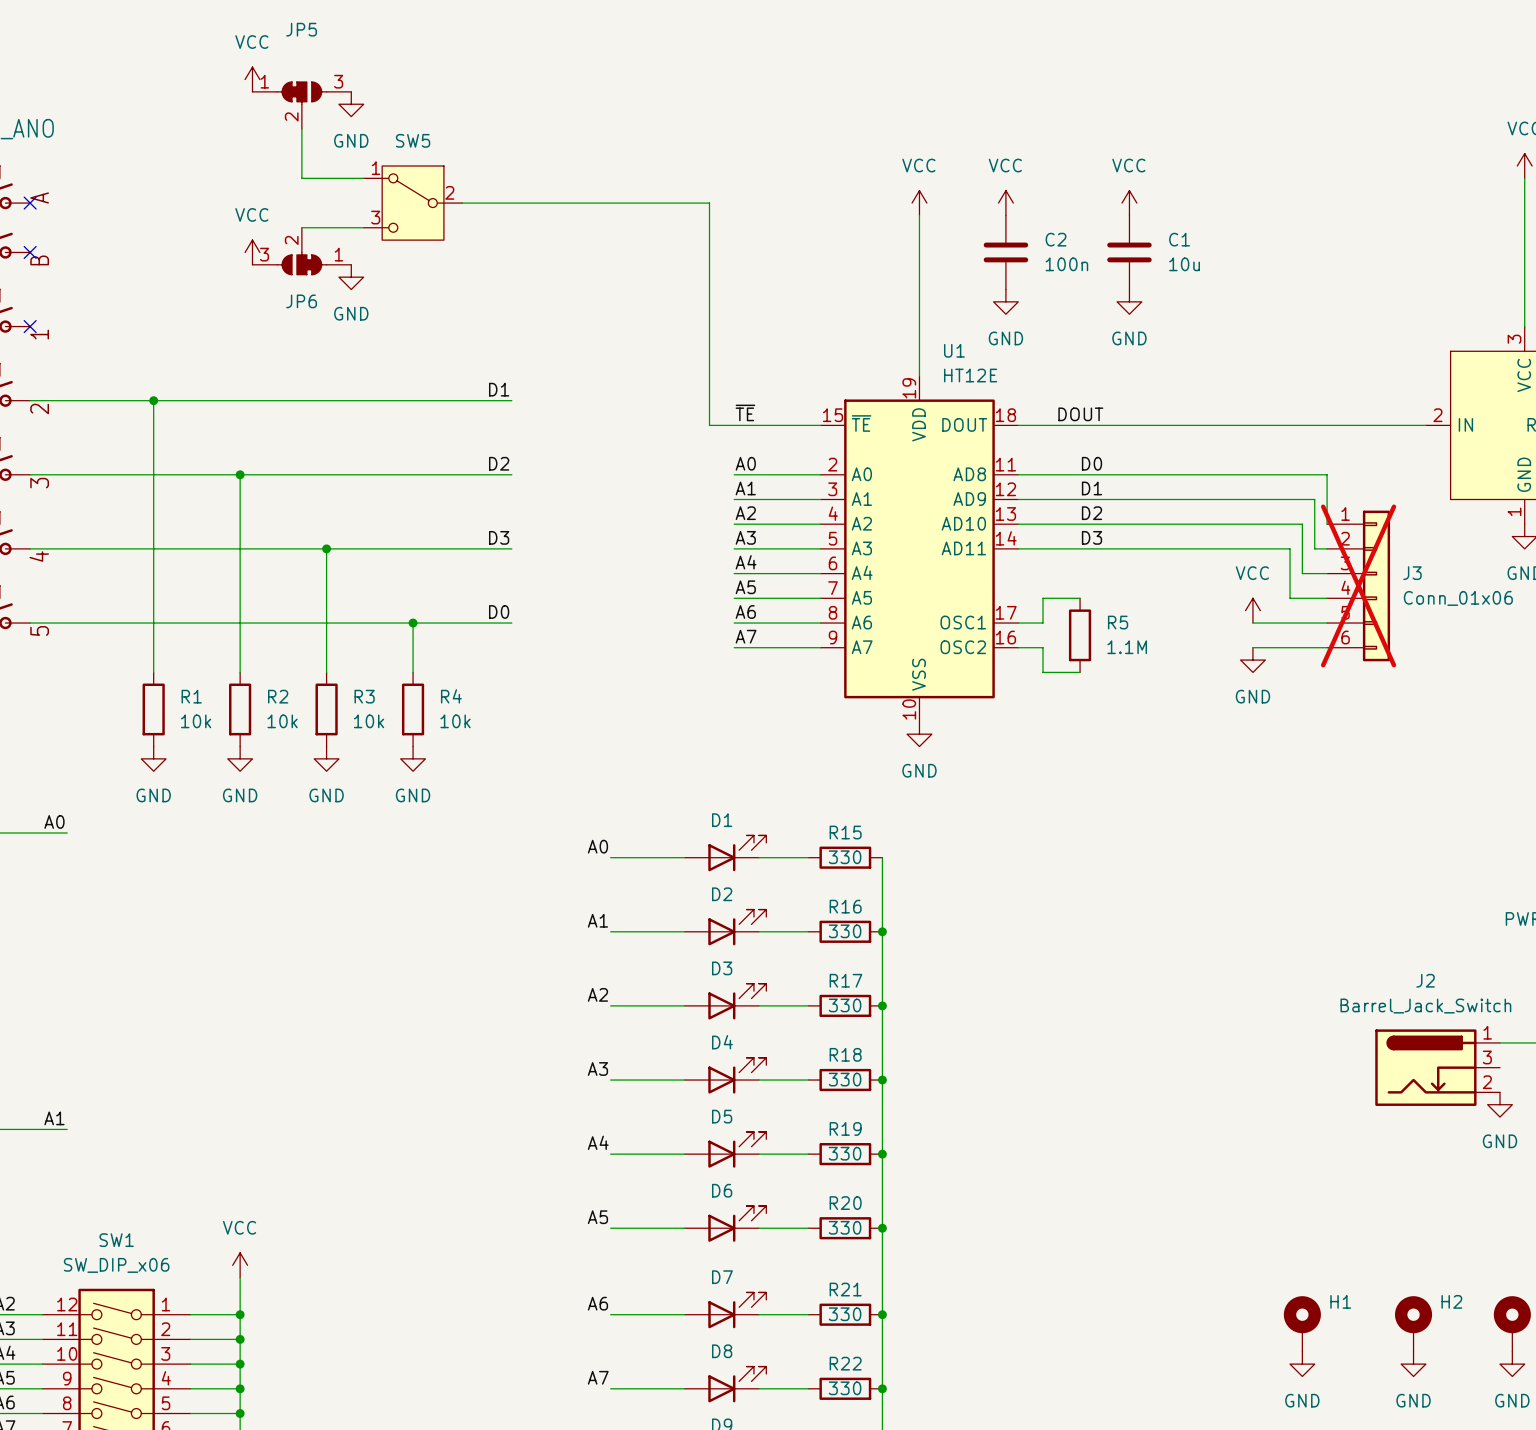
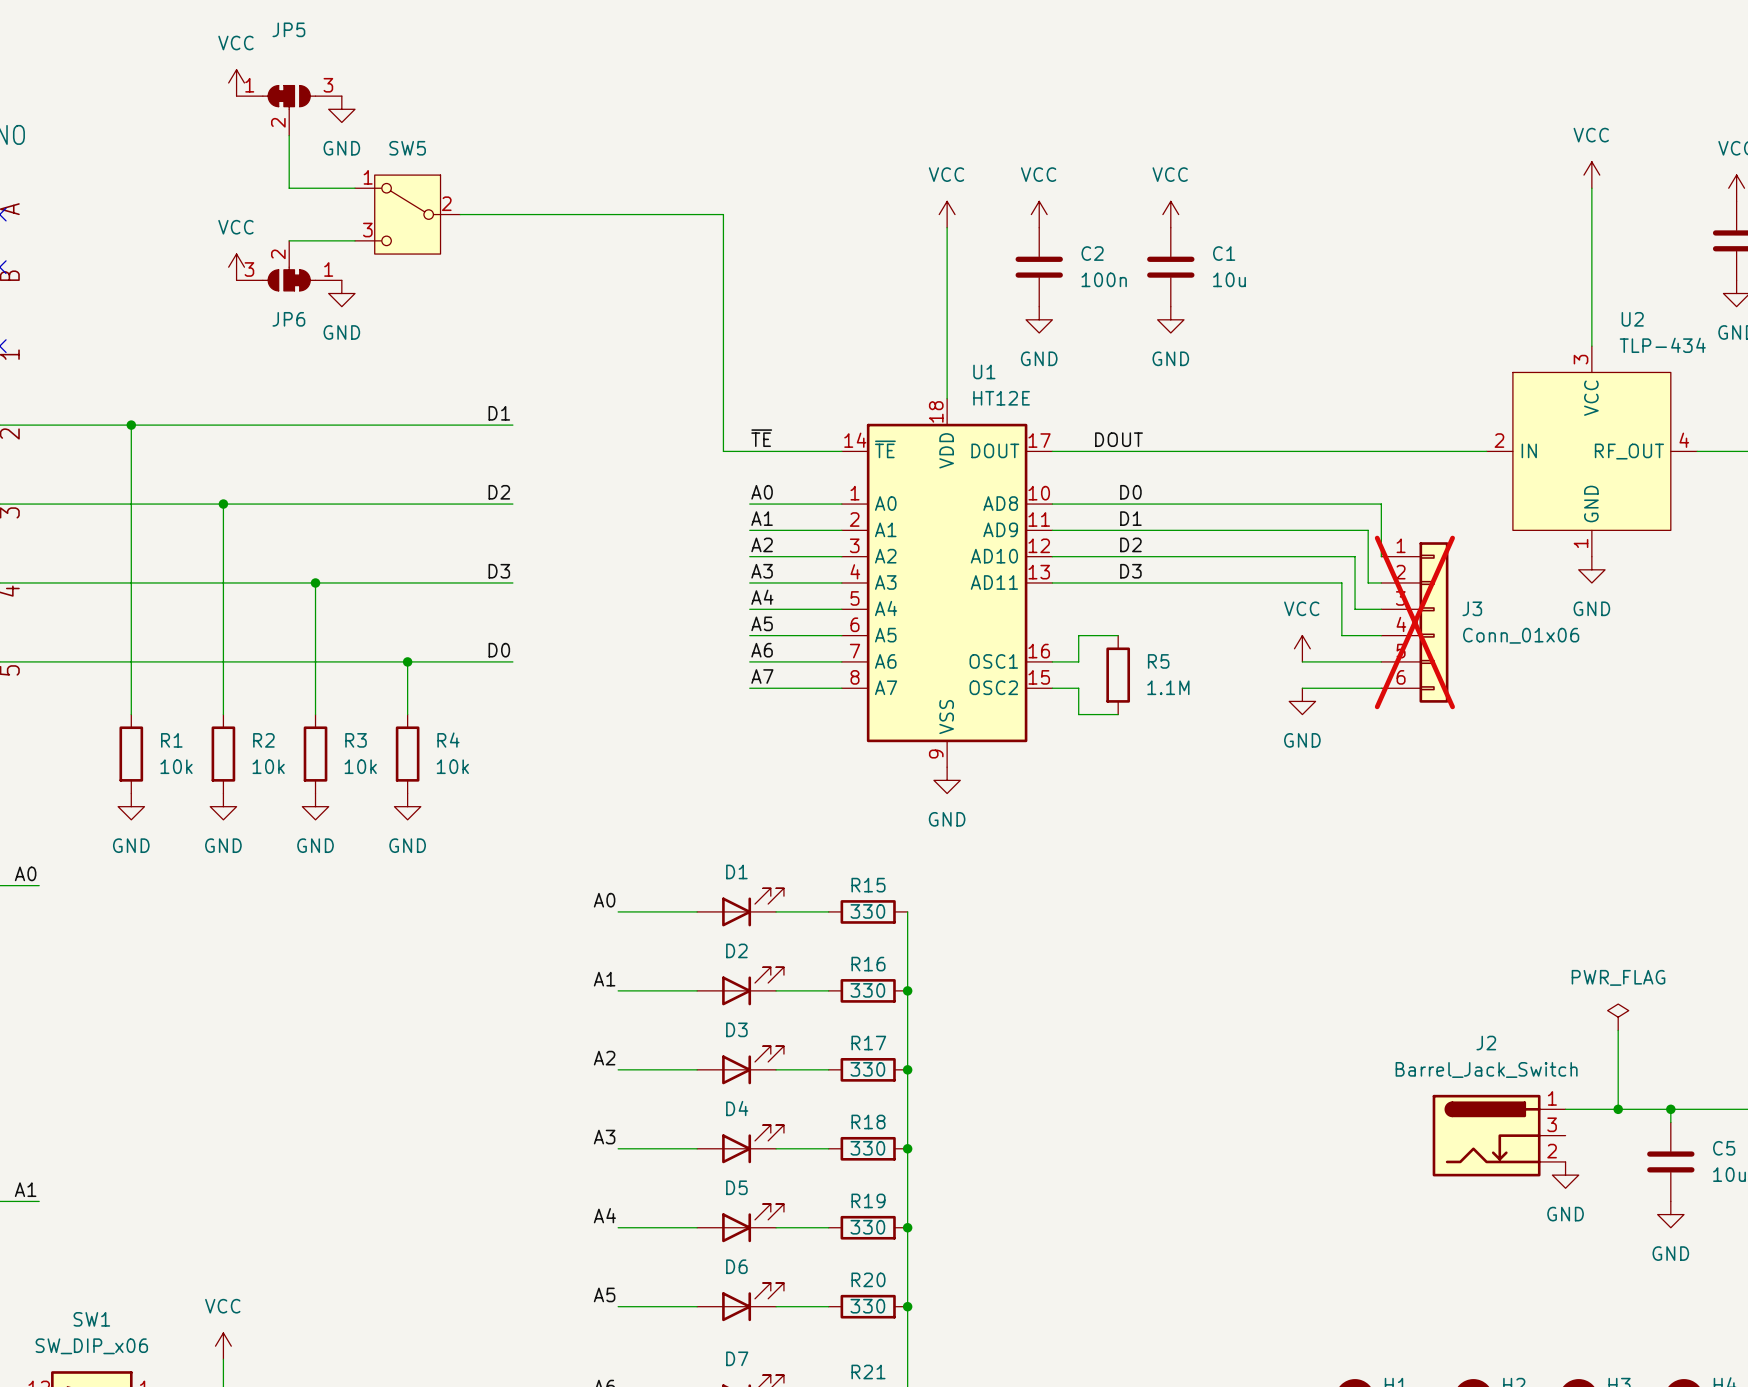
U1 symbol: [820, 375, 1019, 722] -> [841, 398, 1053, 768]

